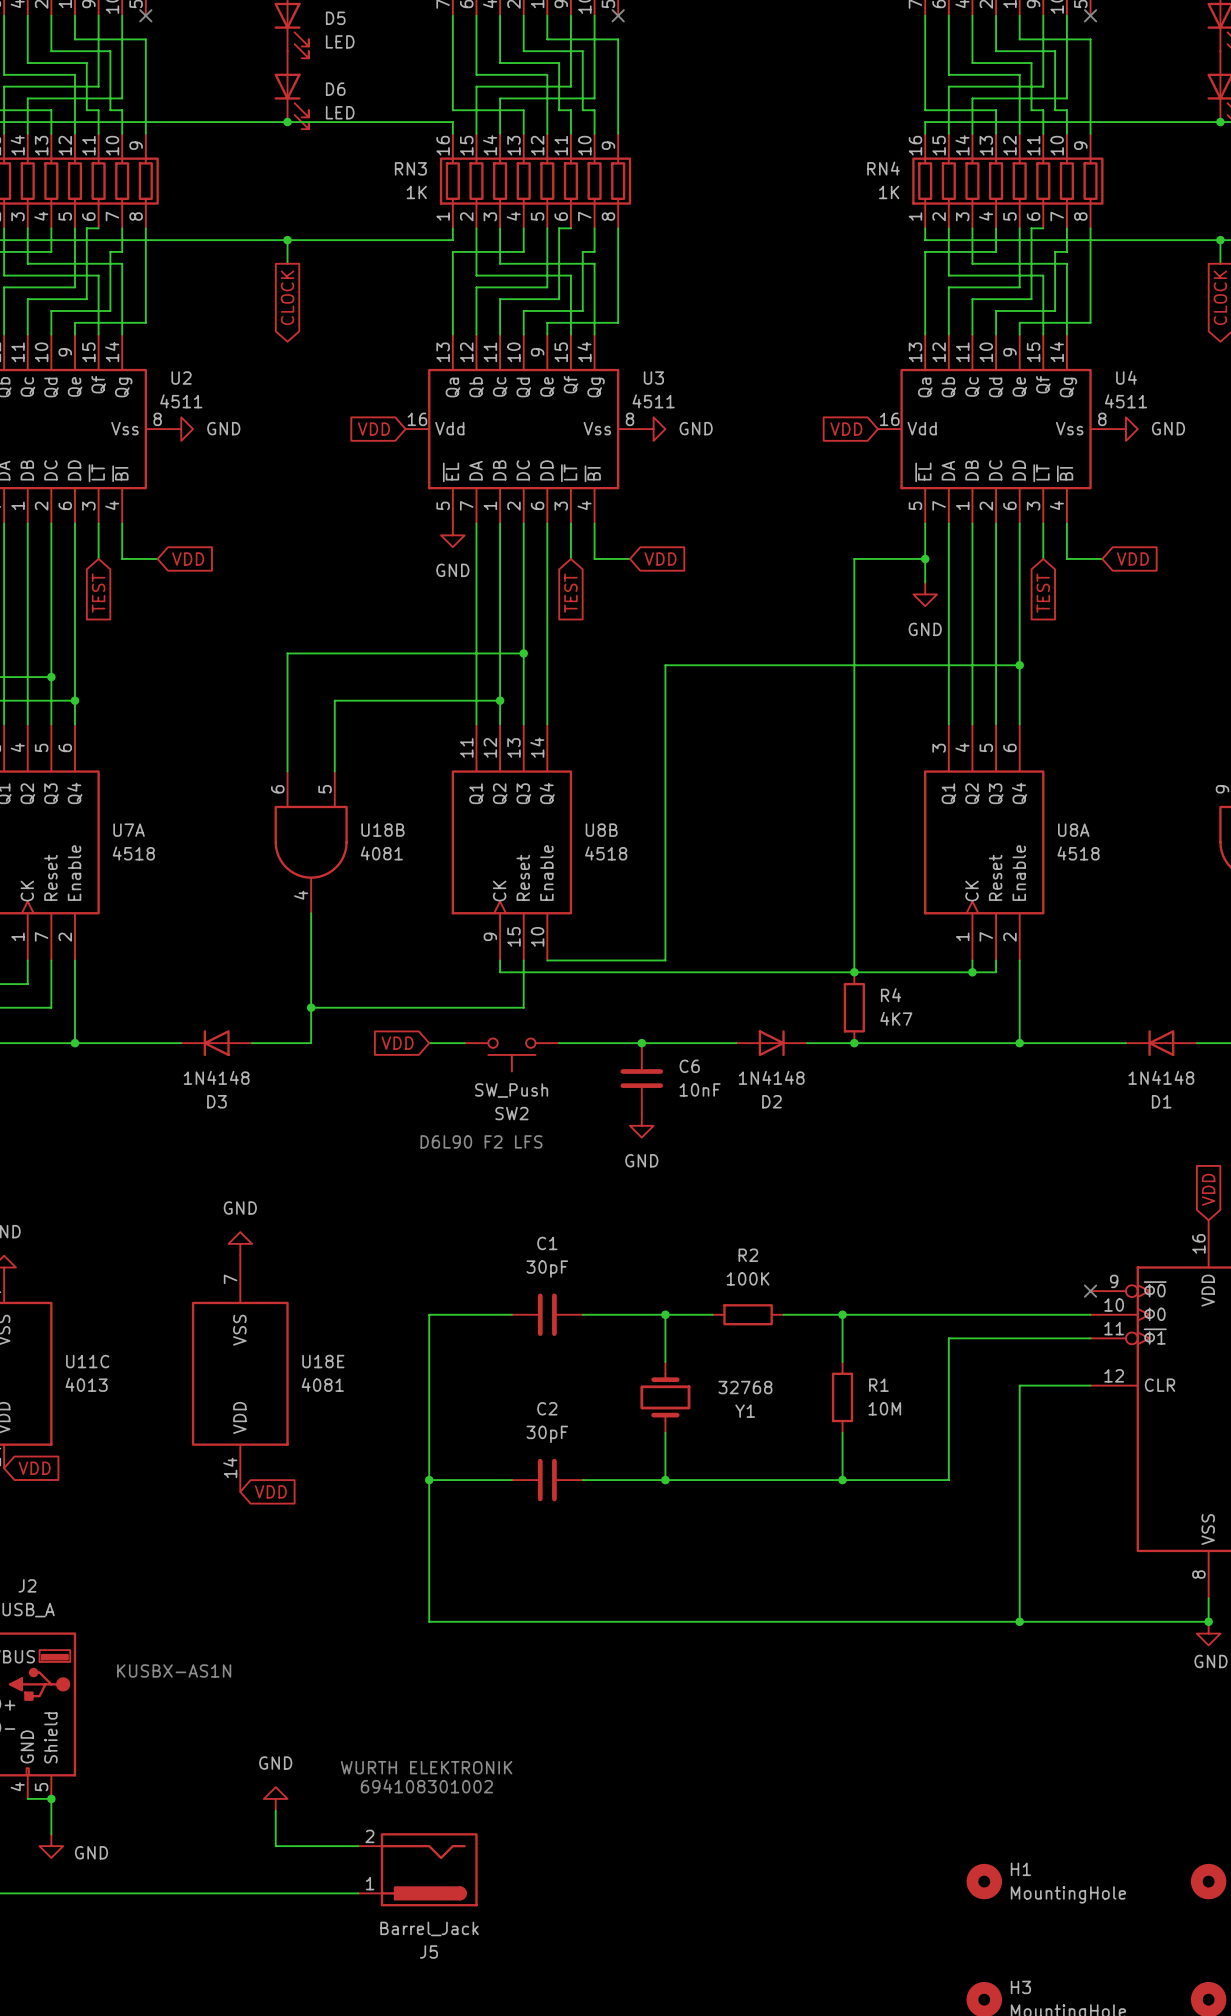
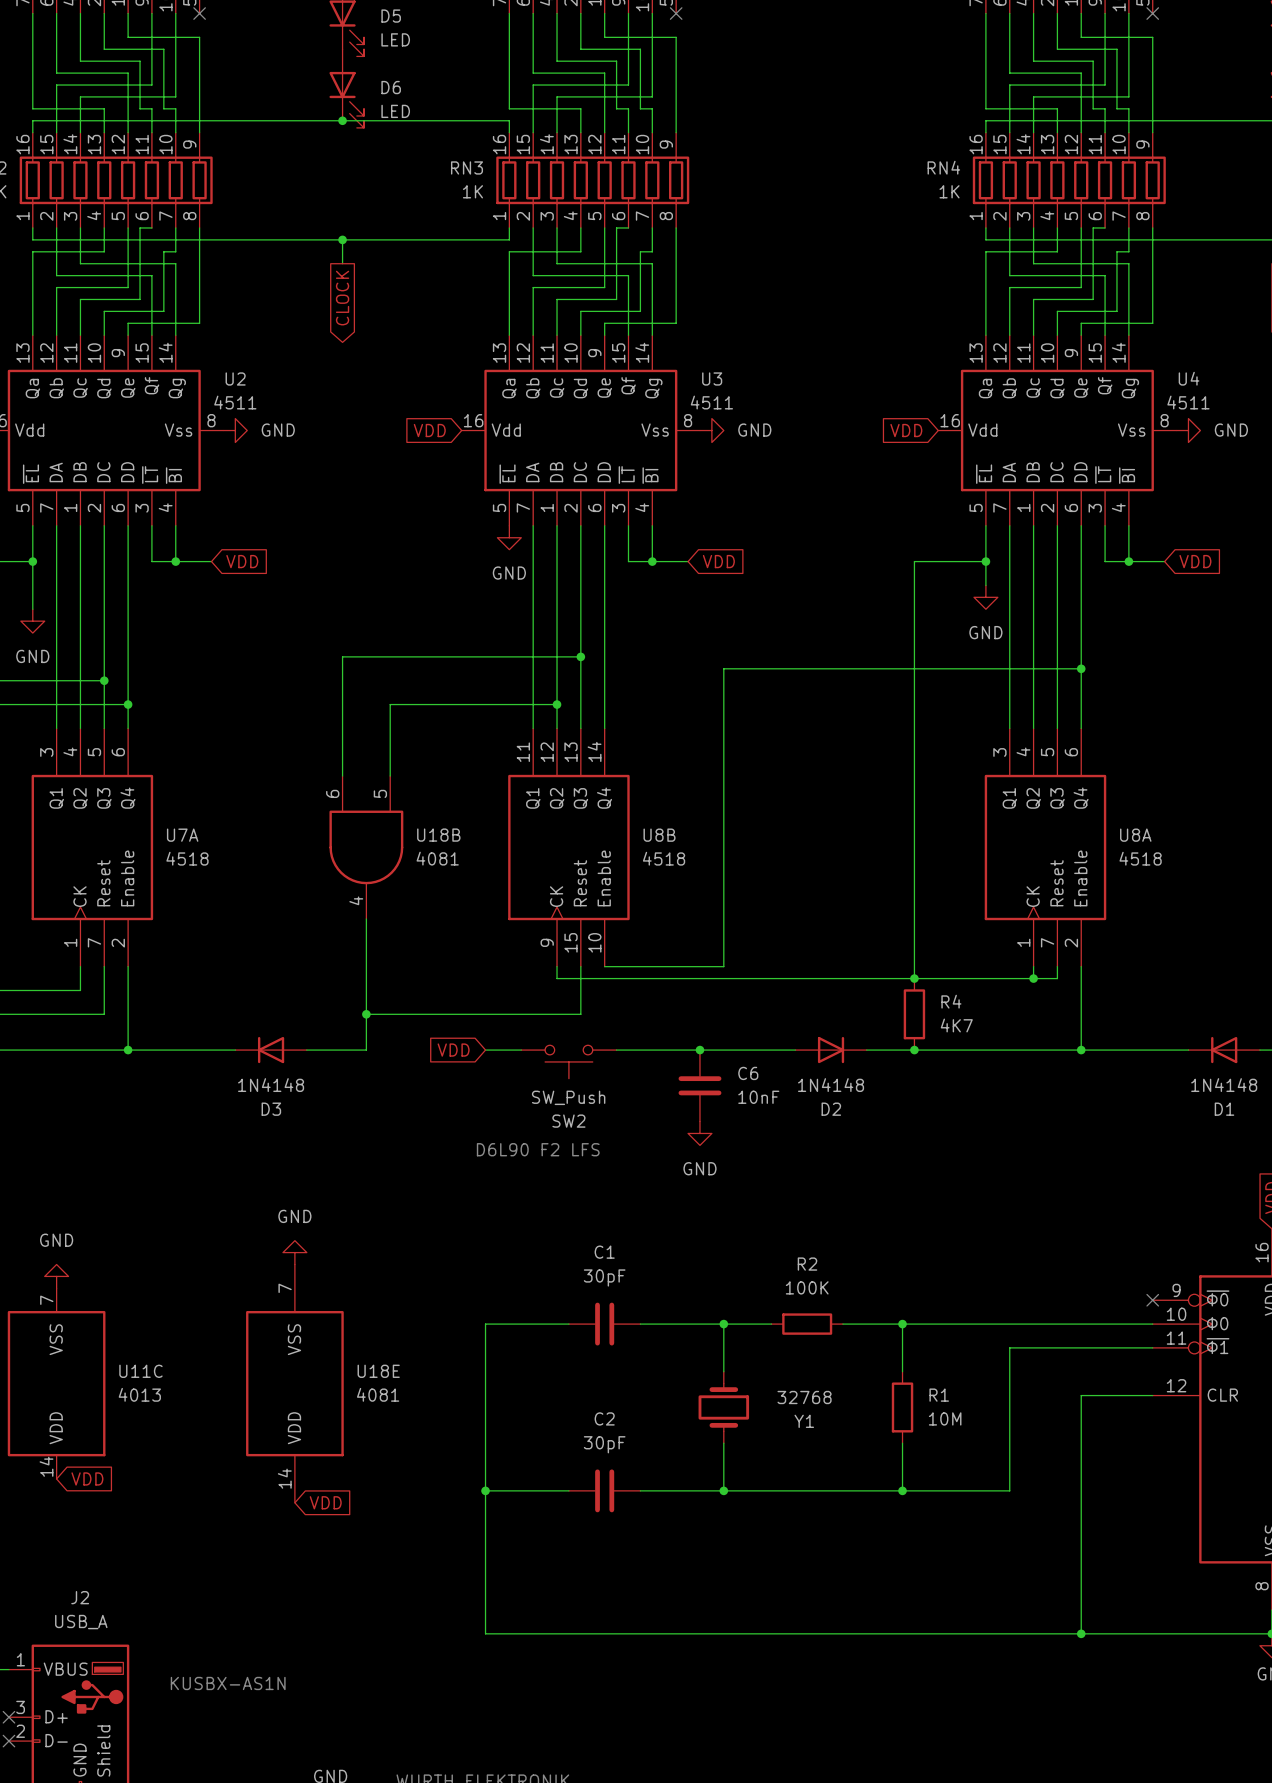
wire: none -> (151, 561) (175, 561)
junction: none -> (175, 561)
wire: none -> (628, 561) (652, 561)
junction: none -> (652, 561)
wire: none -> (1105, 561) (1128, 561)
junction: none -> (1128, 561)
global label: TEST (98, 593) -> none
global label: TEST (570, 593) -> none
global label: TEST (1043, 593) -> none

